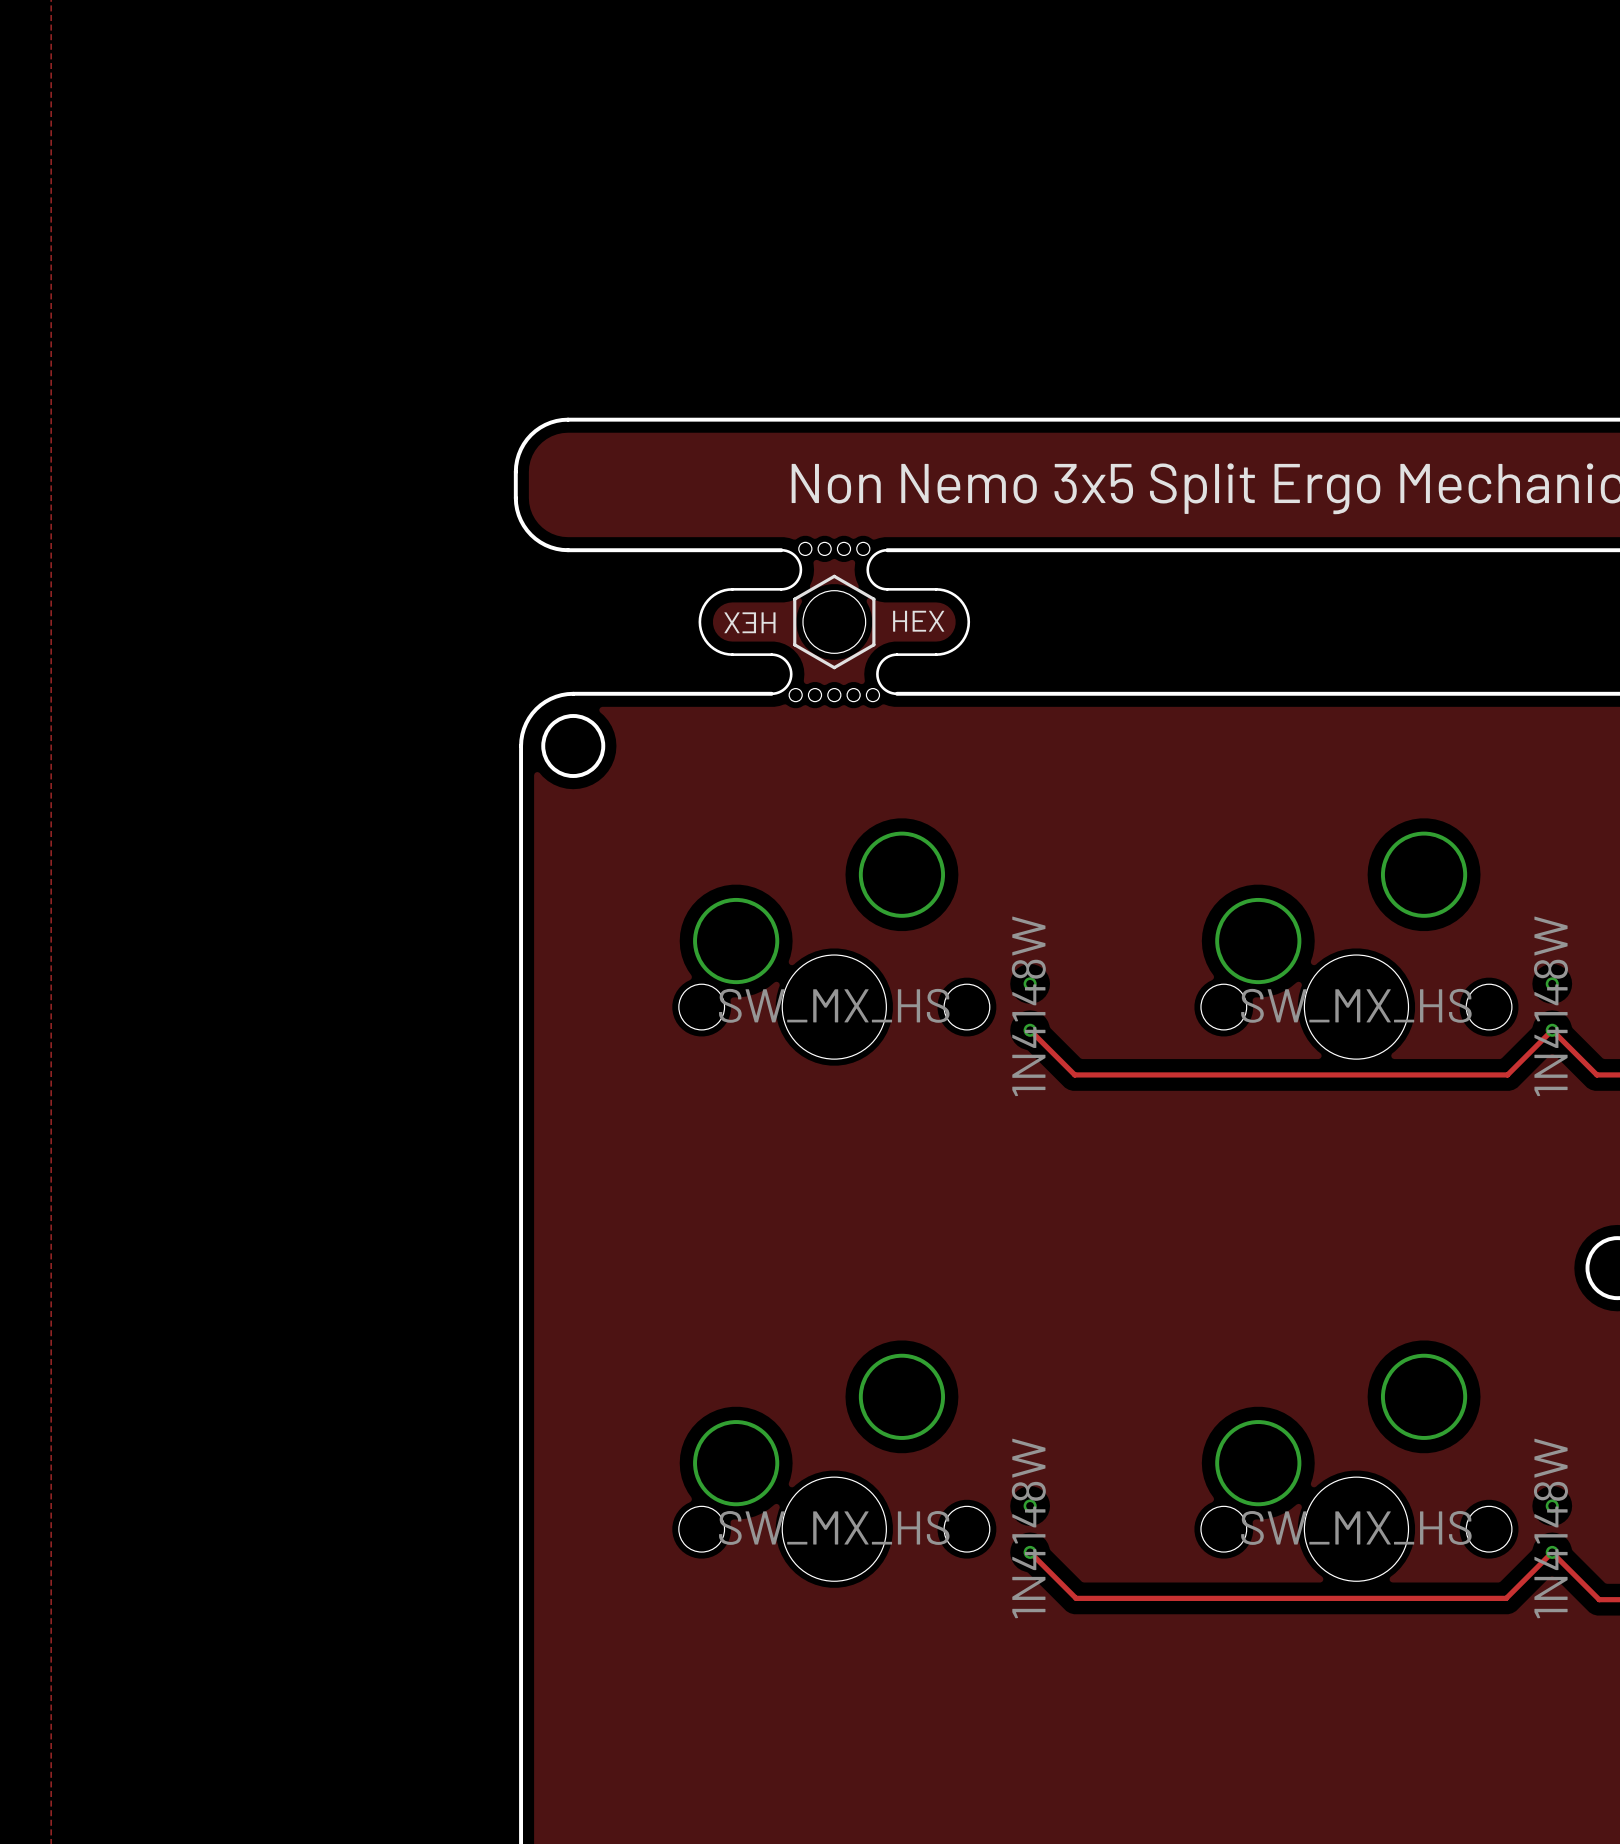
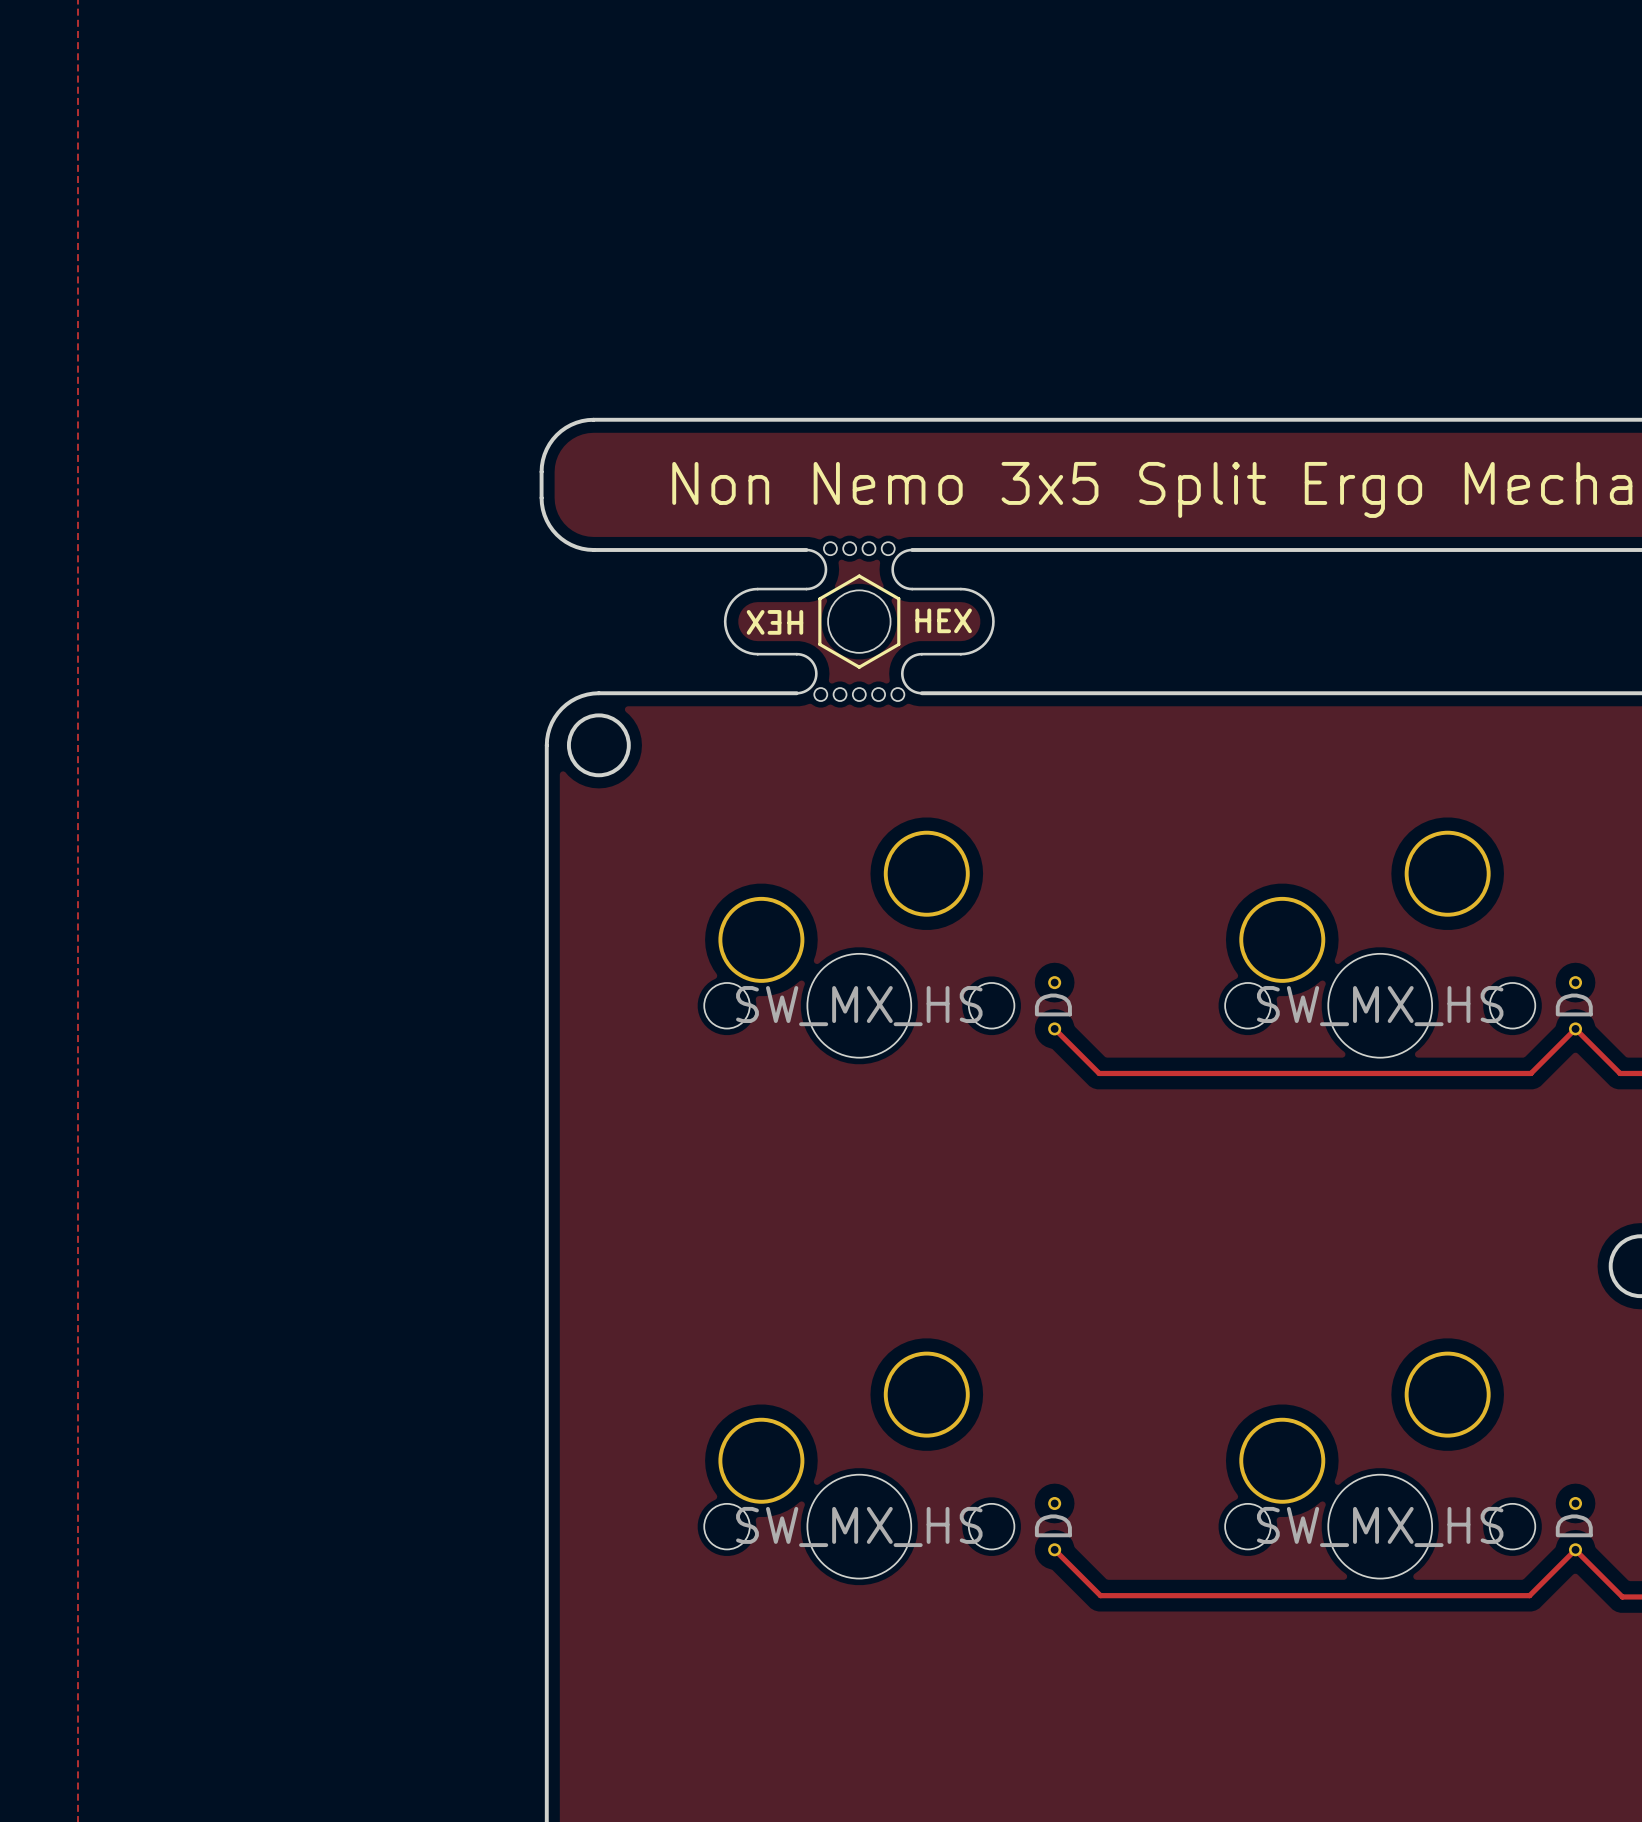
part value: 1N4148W (1028, 1006) -> D (1053, 1004)
part value: 1N4148W (1550, 1006) -> D (1574, 1004)
part value: 1N4148W (1028, 1528) -> D (1053, 1525)
part value: 1N4148W (1550, 1528) -> D (1574, 1525)

